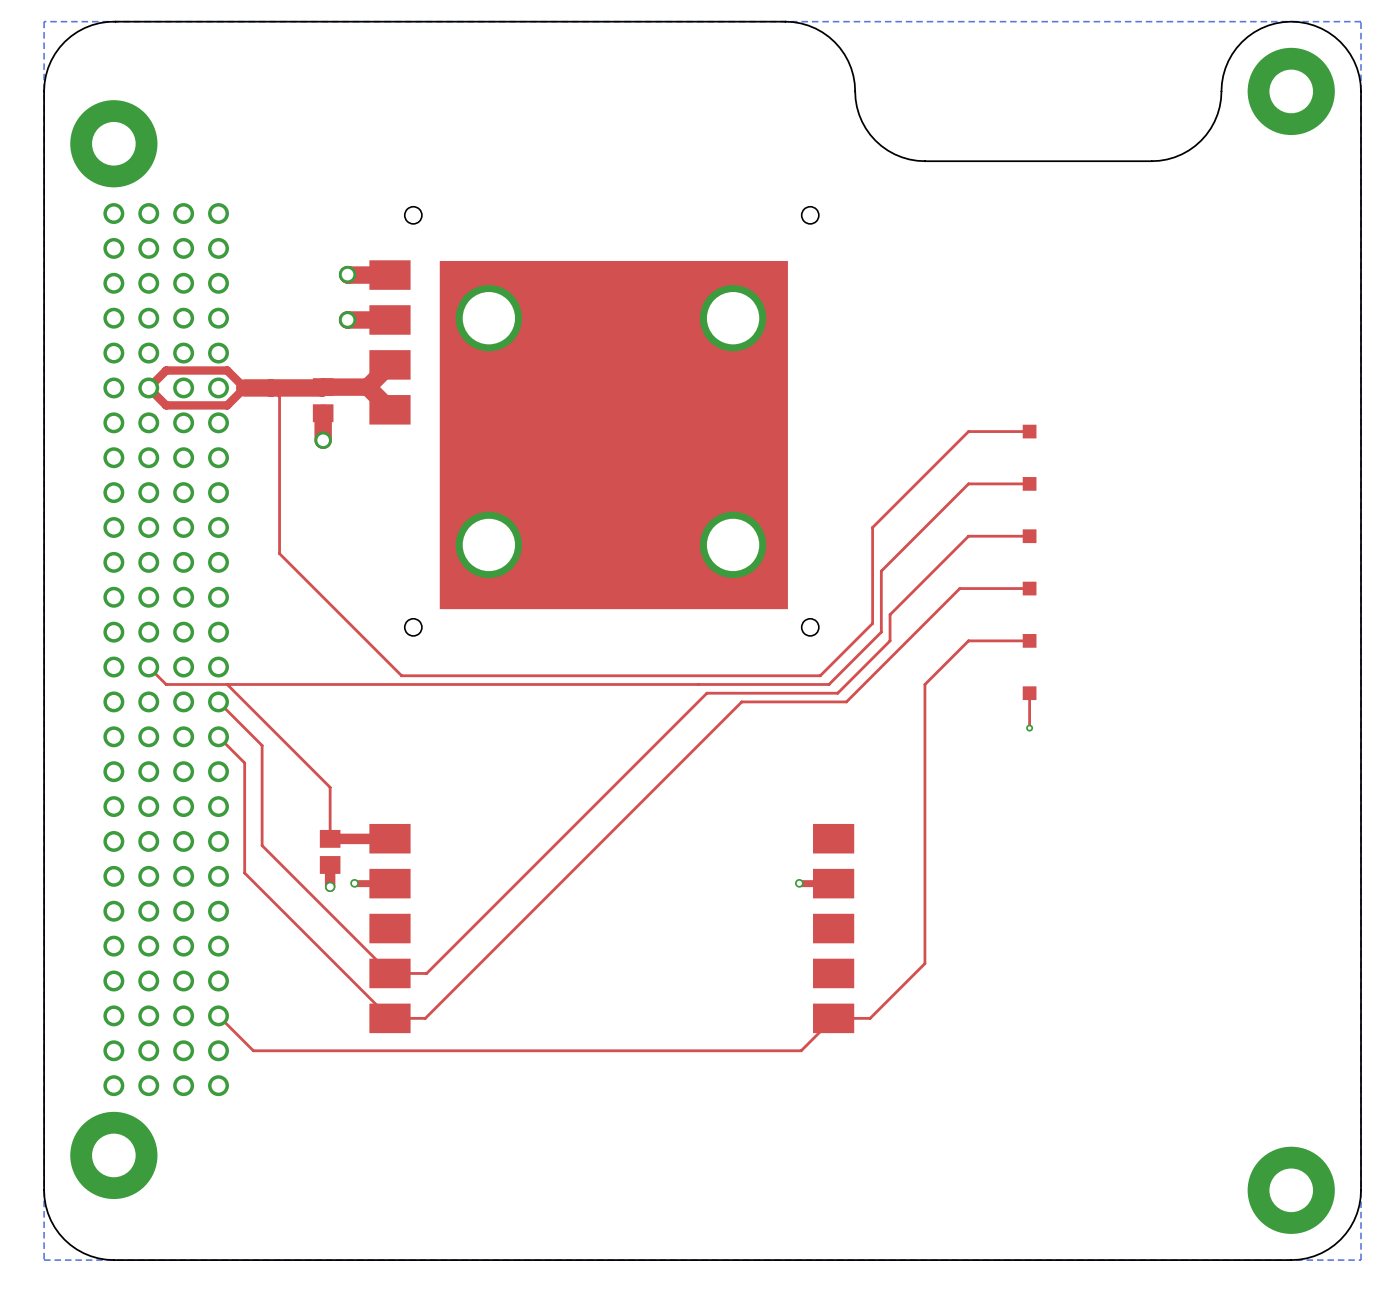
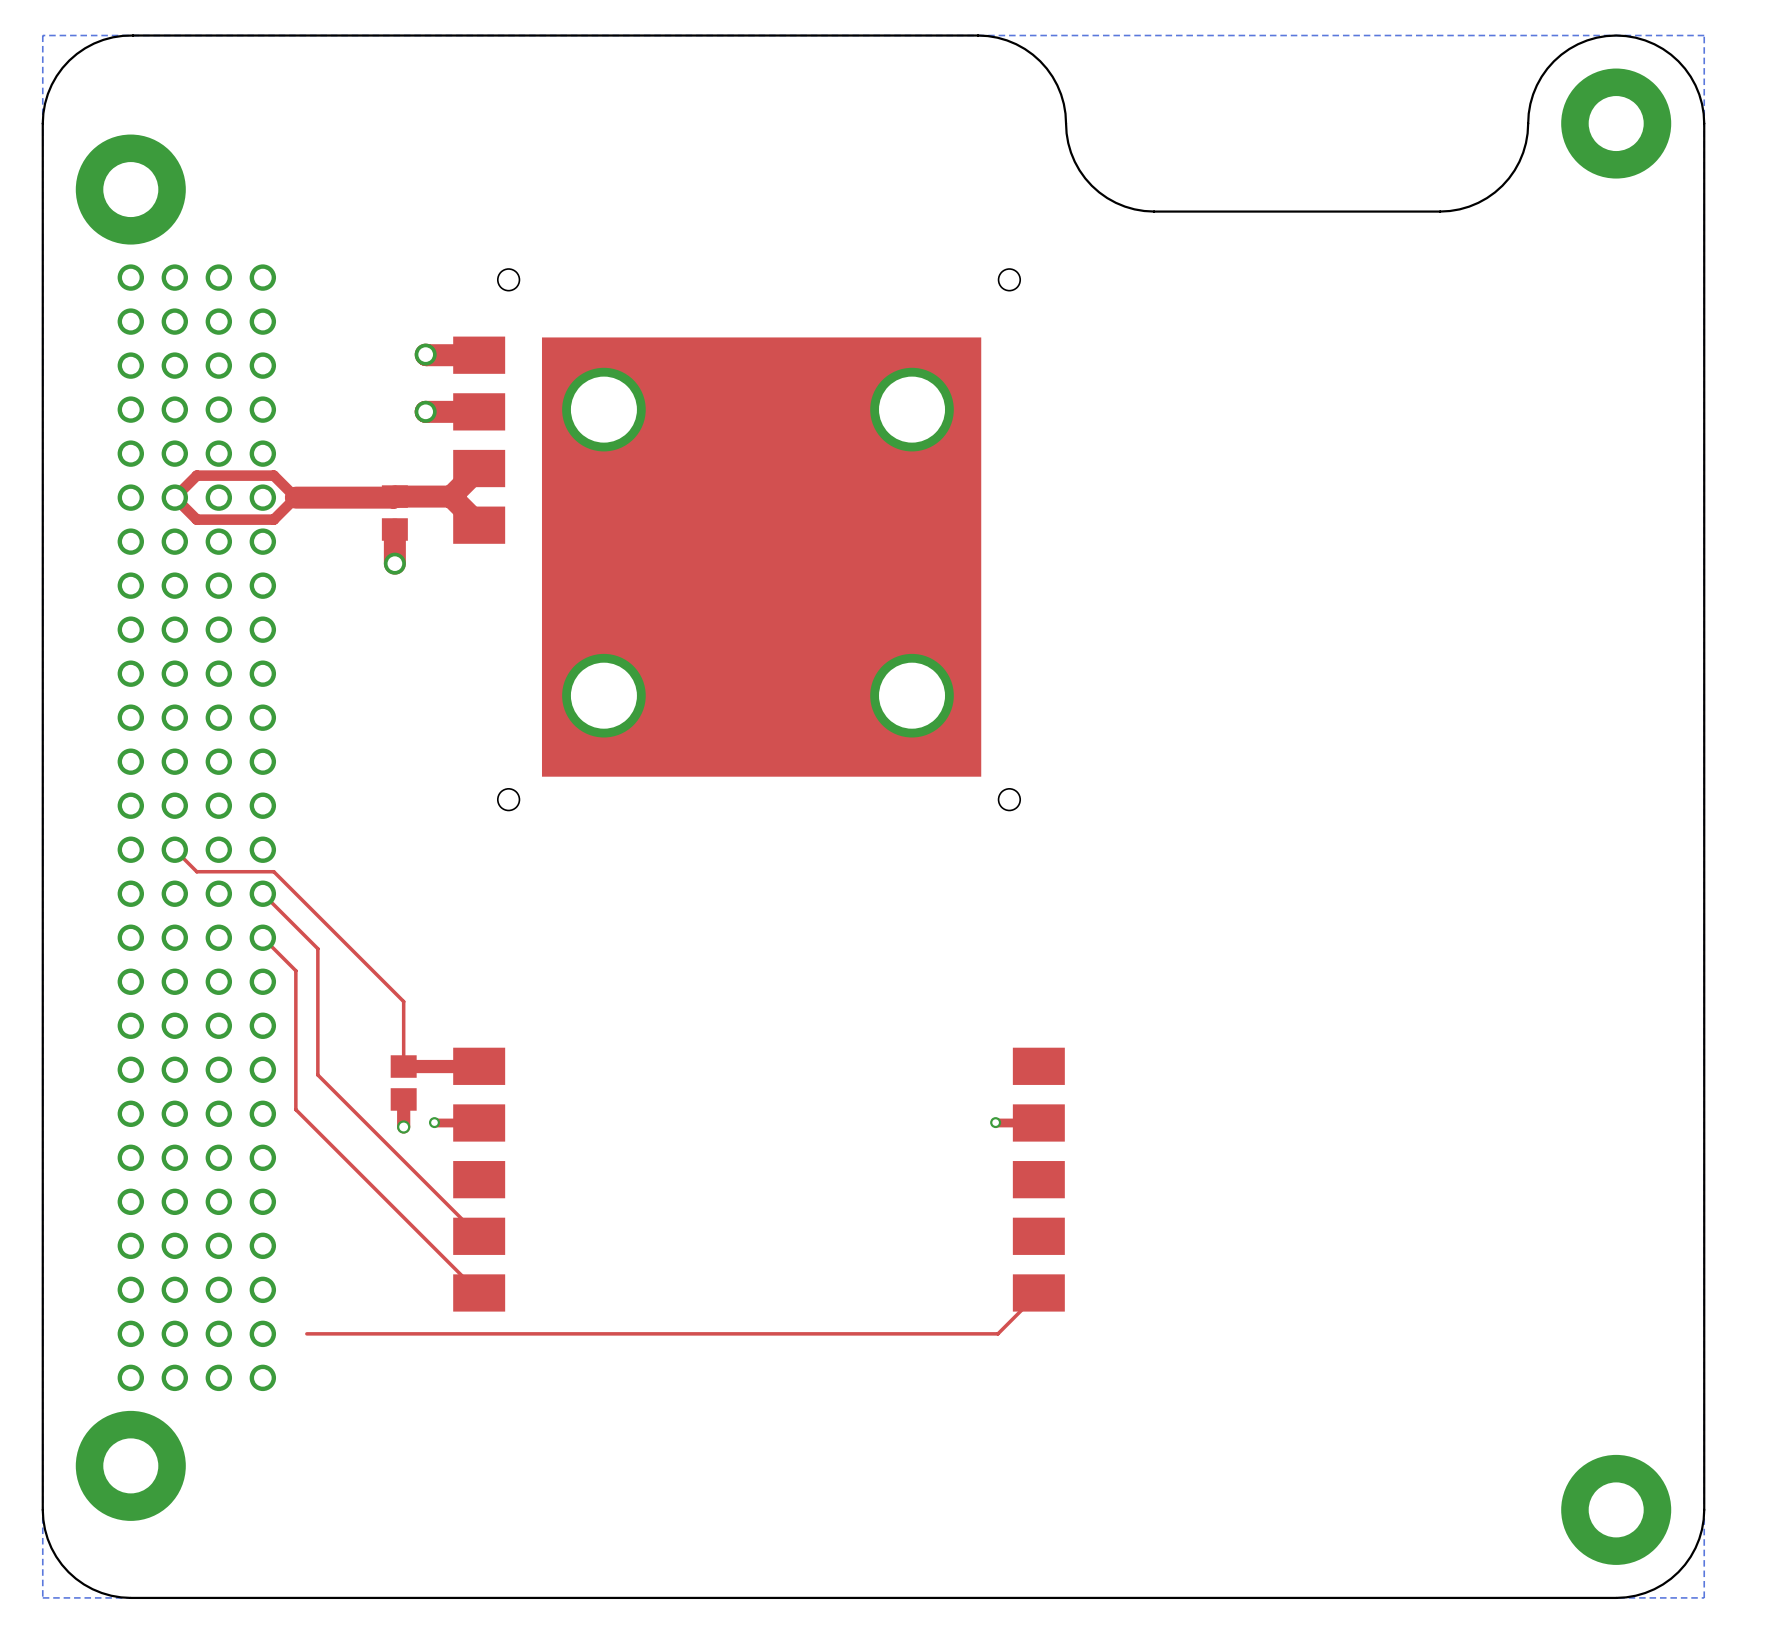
top track: (270, 387) (279, 396) (279, 553) (401, 675) (820, 675) (872, 623) (872, 527) (968, 431) (1029, 431) -> none
part: (1029, 431) -> none
top track: (1029, 483) (968, 483) (881, 571) (881, 632) (829, 684) (227, 684) -> none
part: (1029, 483) -> none
top track: (1029, 536) (968, 536) (890, 614) (890, 640) (837, 693) (706, 693) (426, 973) (389, 973) -> none
part: (1029, 536) -> none
top track: (1029, 588) (959, 588) (846, 701) (741, 701) (425, 1018) (389, 1018) -> none
part: (1029, 588) -> none
top track: (1029, 640) (968, 640) (924, 684) (924, 963) (870, 1018) (833, 1018) -> none
part: (1029, 640) -> none
top track: (1029, 693) (1029, 728) -> none
part: (1029, 693) -> none
via: (1029, 728) -> none
top track: (218, 1015) (253, 1050) -> none

